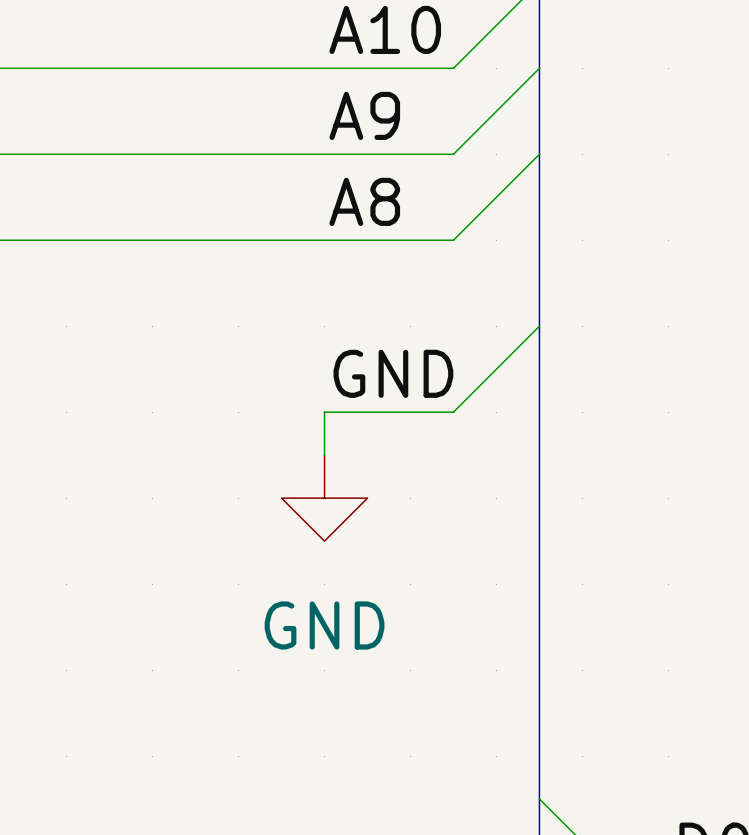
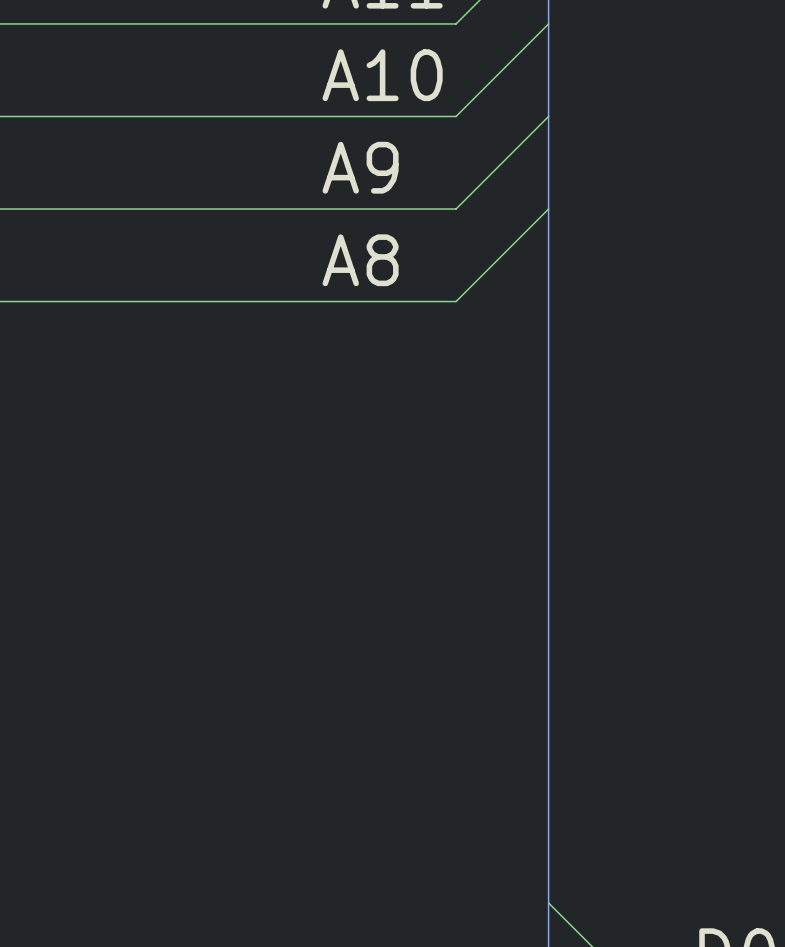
wire: (539, 326) (453, 412) (324, 412) (324, 455) -> none
label: GND (393, 373) -> none
power symbol: GND (324, 498) -> none

